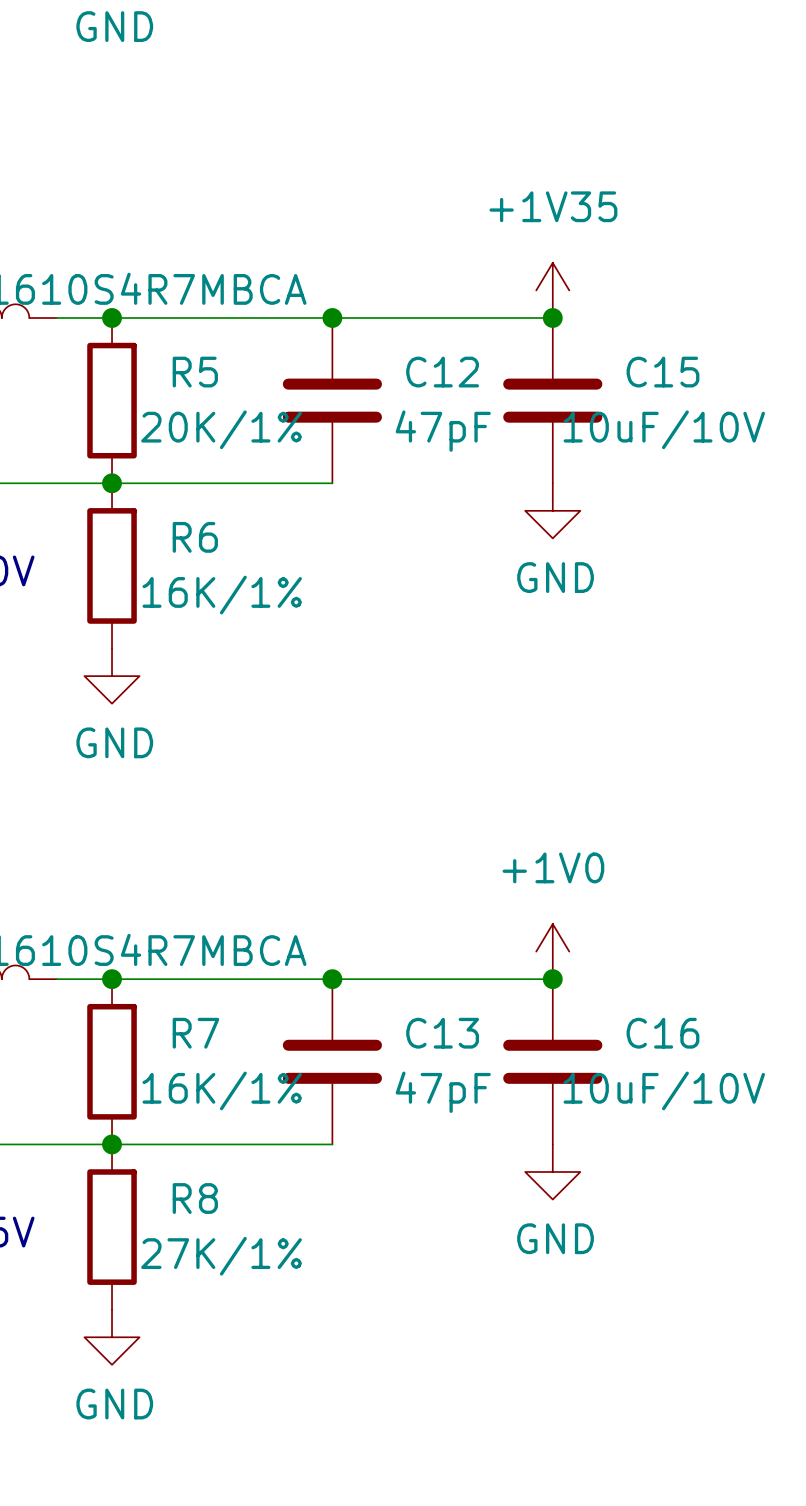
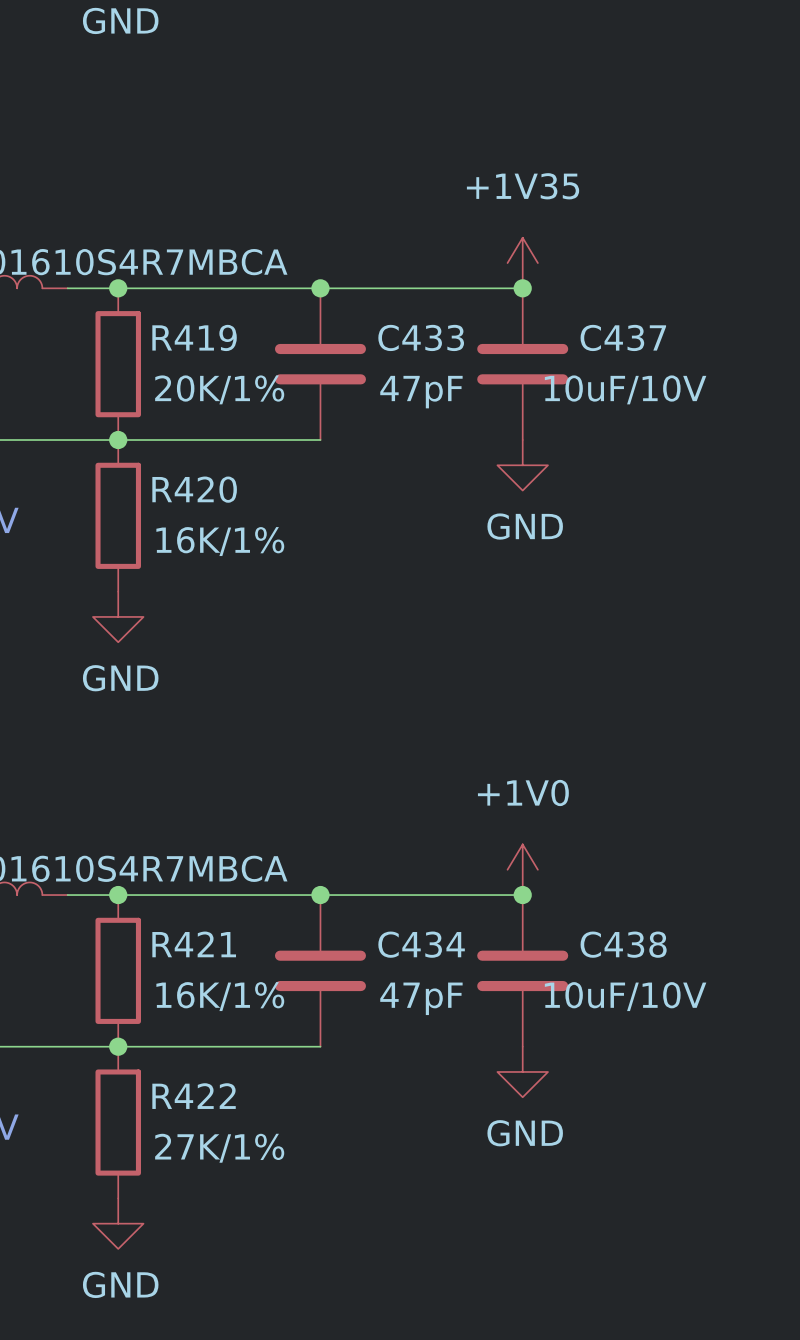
R5 name: R5 (195, 372) -> R419 (194, 337)
C12 name: C12 (442, 372) -> C433 (421, 337)
C15 name: C15 (662, 372) -> C437 (623, 337)
R6 name: R6 (195, 537) -> R420 (194, 489)
R7 name: R7 (195, 1033) -> R421 (194, 944)
C13 name: C13 (442, 1033) -> C434 (421, 944)
C16 name: C16 (662, 1033) -> C438 (623, 944)
R8 name: R8 (195, 1198) -> R422 (194, 1096)

